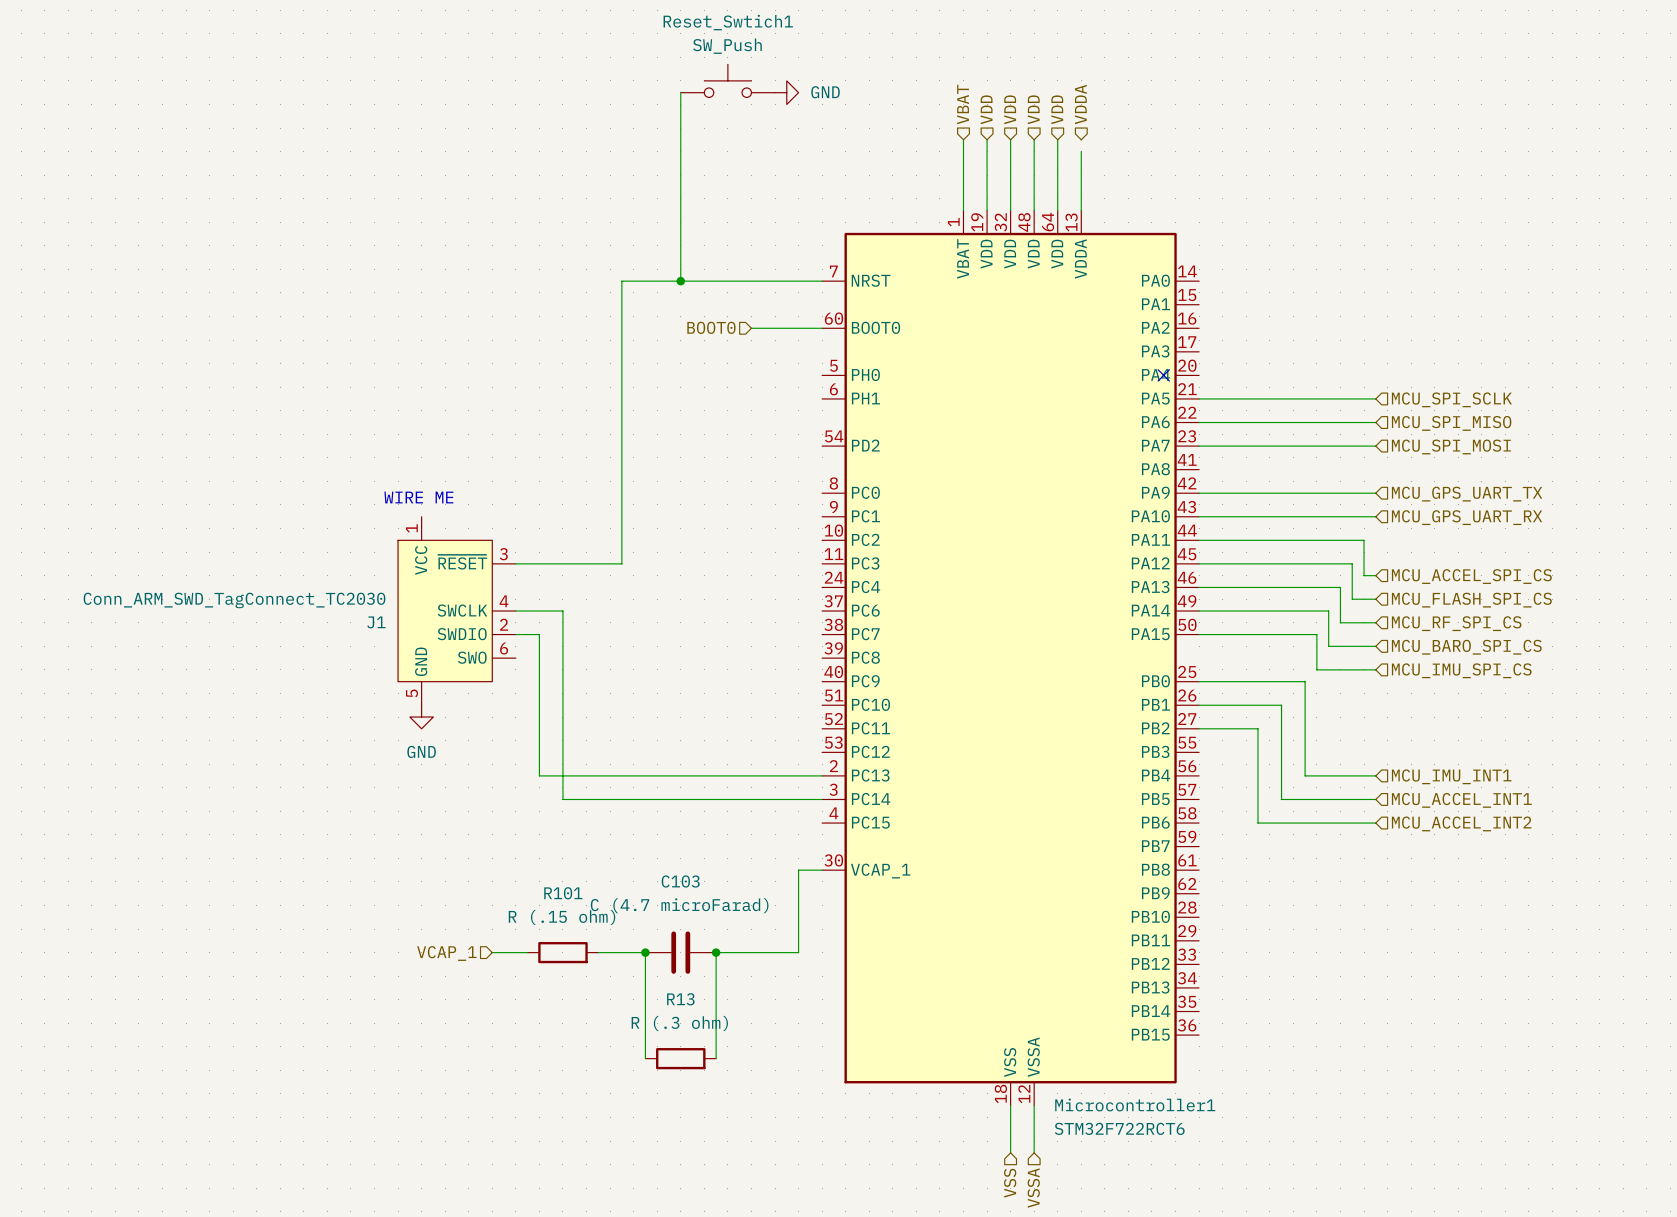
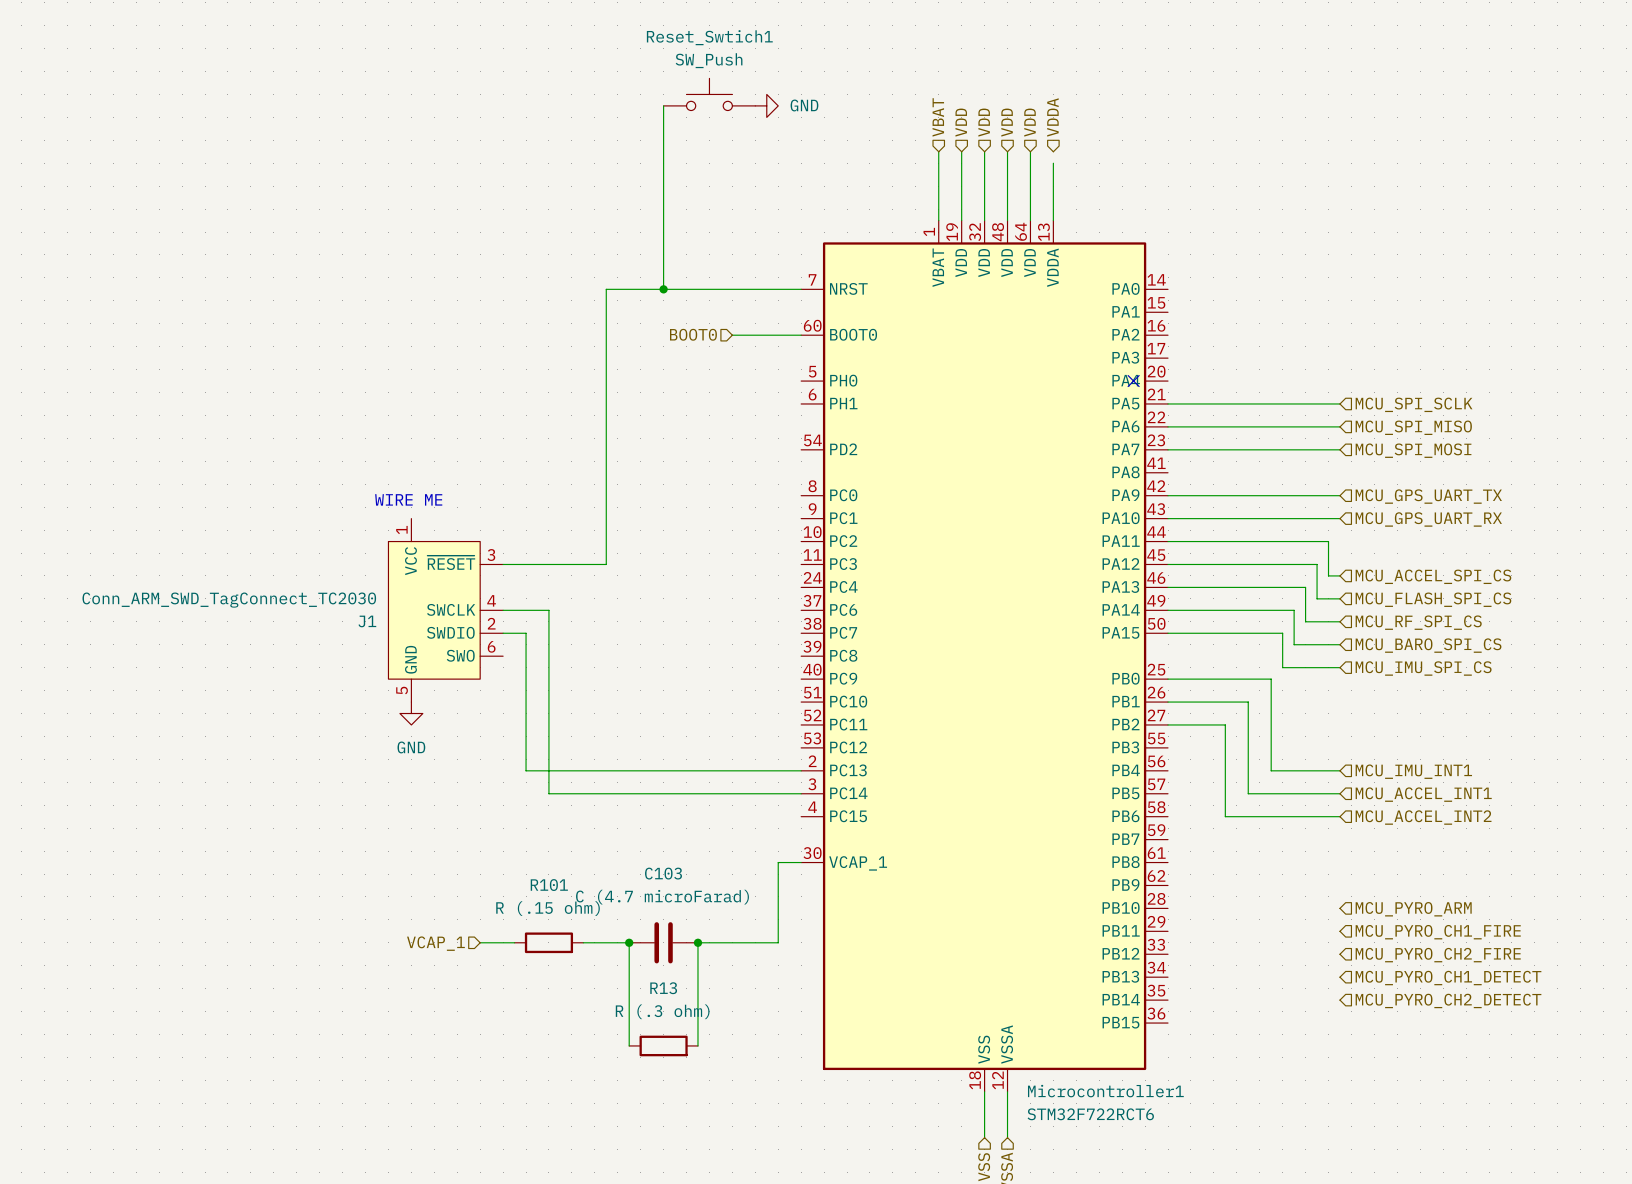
hierarchical label: none -> MCU_PYRO_ARM (1413, 909)
hierarchical label: none -> MCU_PYRO_CH1_FIRE (1438, 932)
hierarchical label: none -> MCU_PYRO_CH2_FIRE (1438, 955)
hierarchical label: none -> MCU_PYRO_CH1_DETECT (1448, 978)
hierarchical label: none -> MCU_PYRO_CH2_DETECT (1448, 1000)

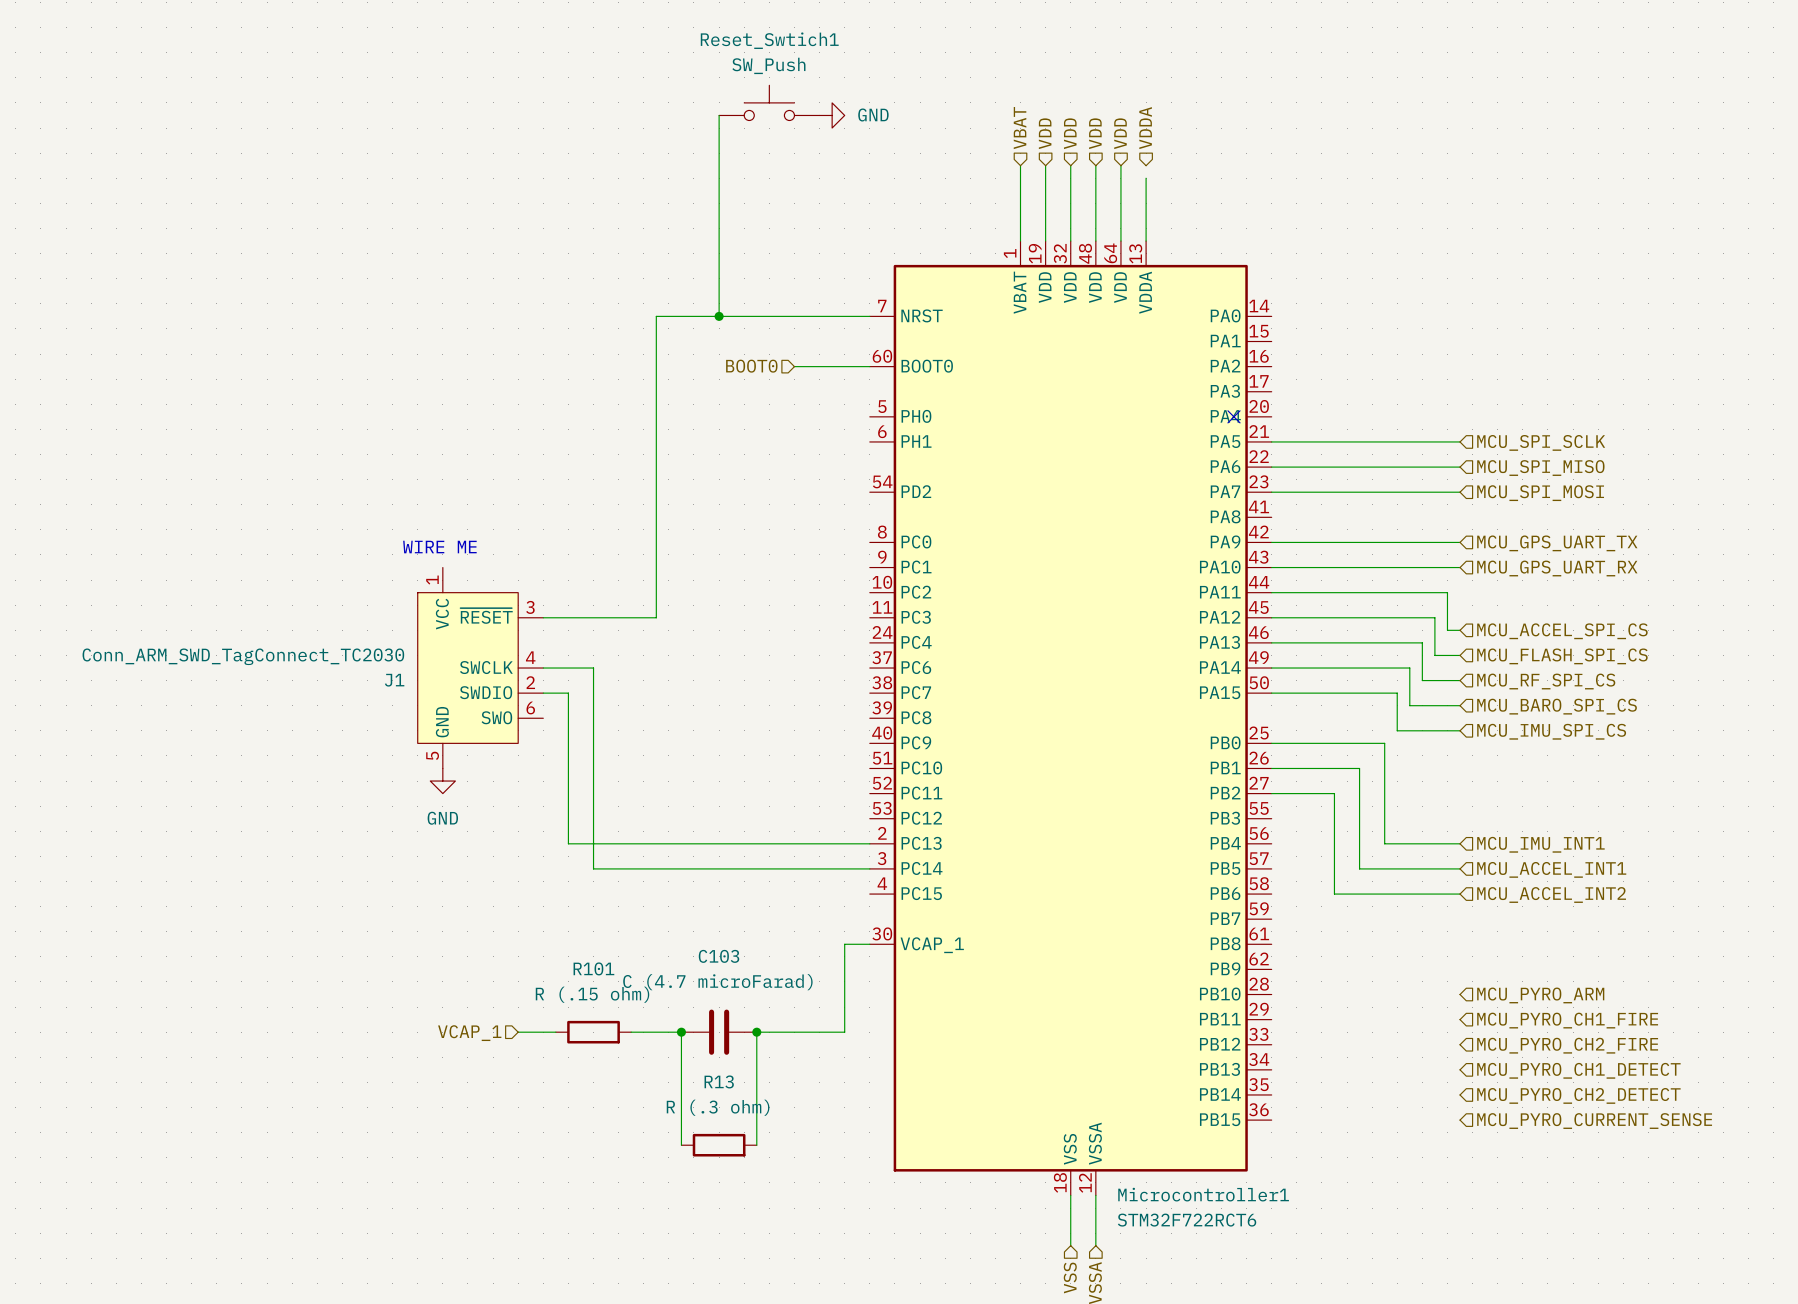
hierarchical label: none -> MCU_PYRO_CURRENT_SENSE (1594, 1121)

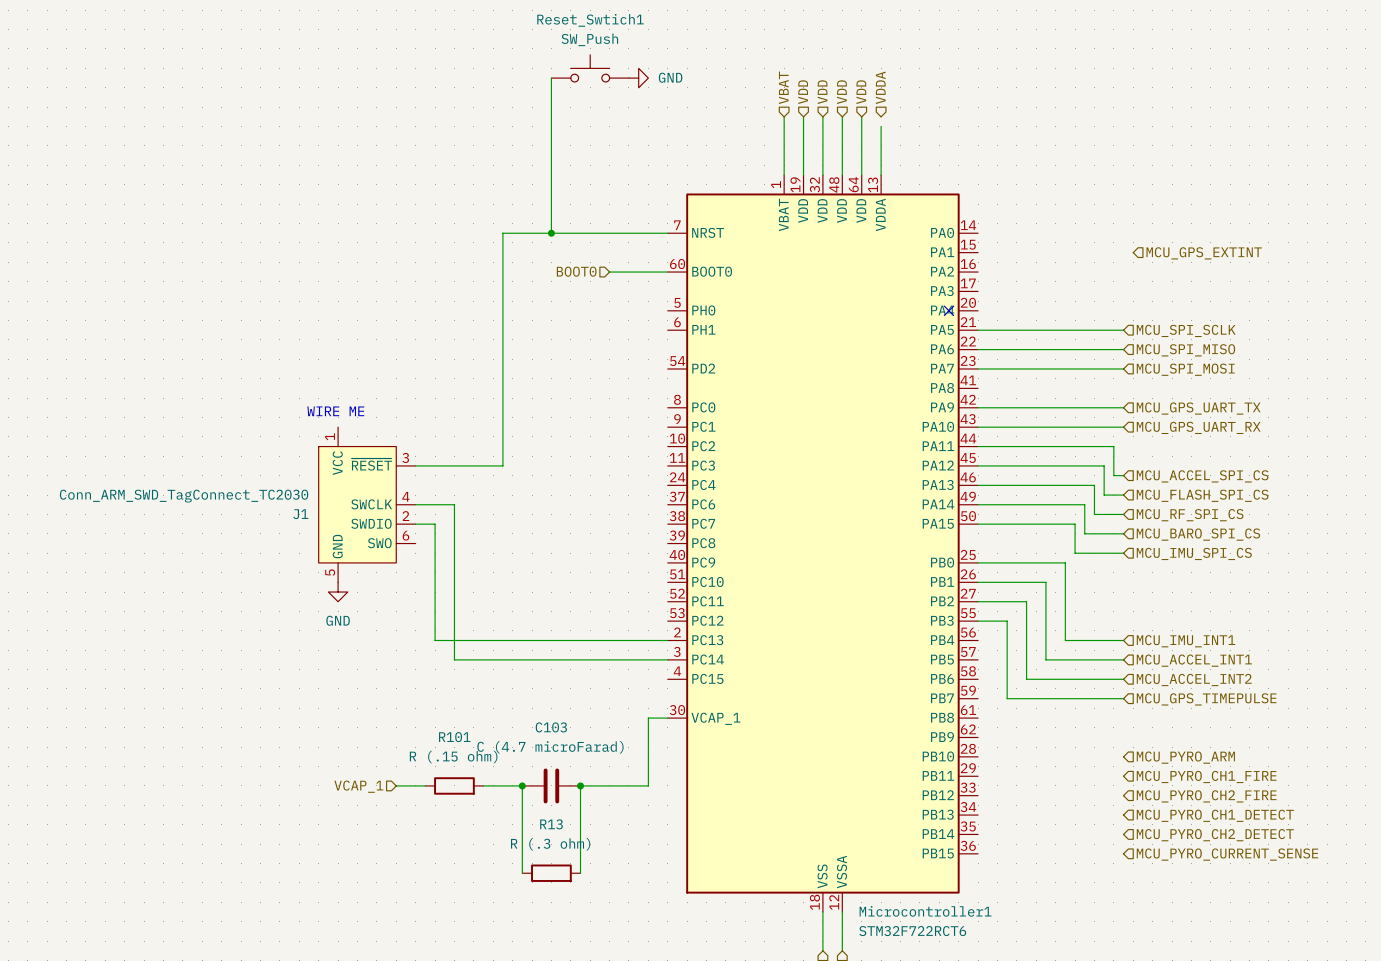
hierarchical label: none -> MCU_GPS_EXTINT (1204, 253)
wire: none -> (978, 621) (1007, 621) (1007, 698) (1123, 698)
hierarchical label: none -> MCU_GPS_TIMEPULSE (1206, 699)

